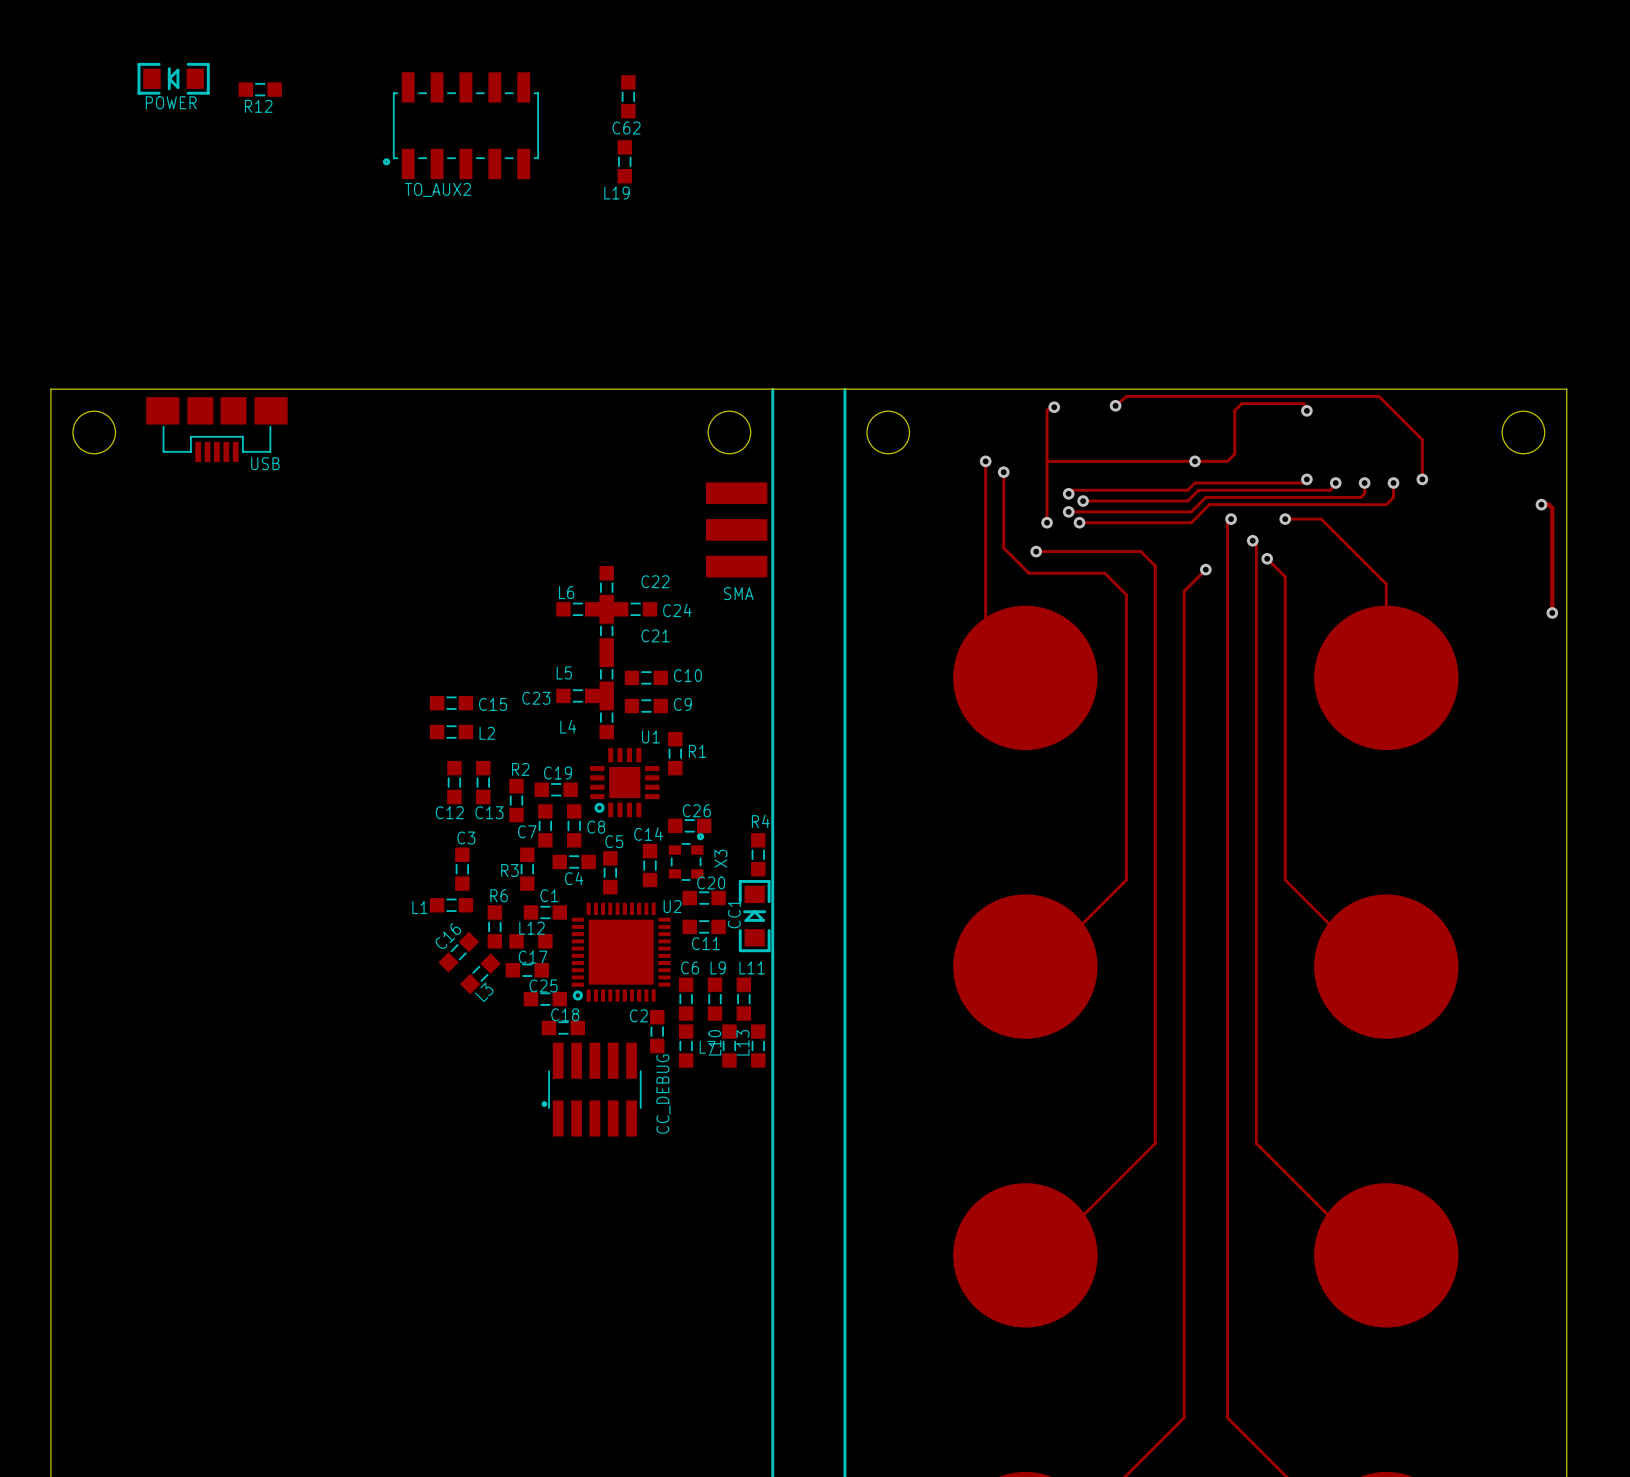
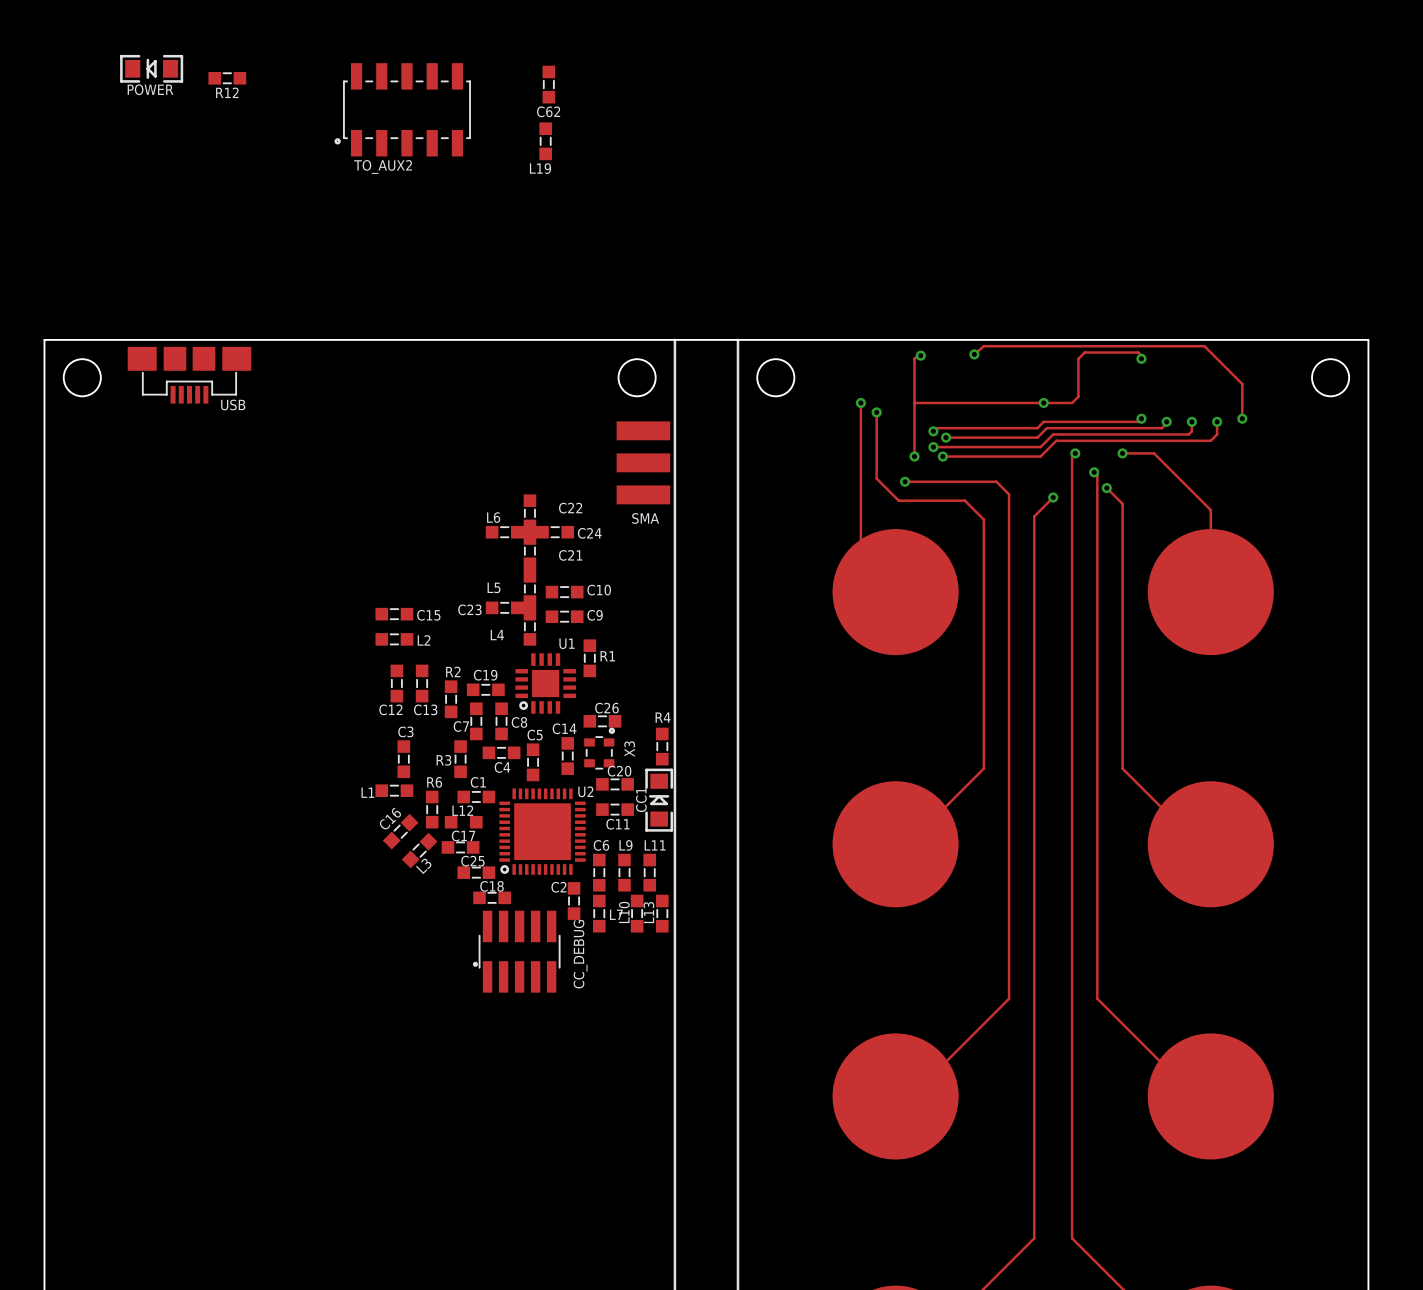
track: (1541, 504) (1548, 504) (1552, 508) (1552, 612) -> none
via: (1541, 504) -> none
via: (1552, 612) -> none

